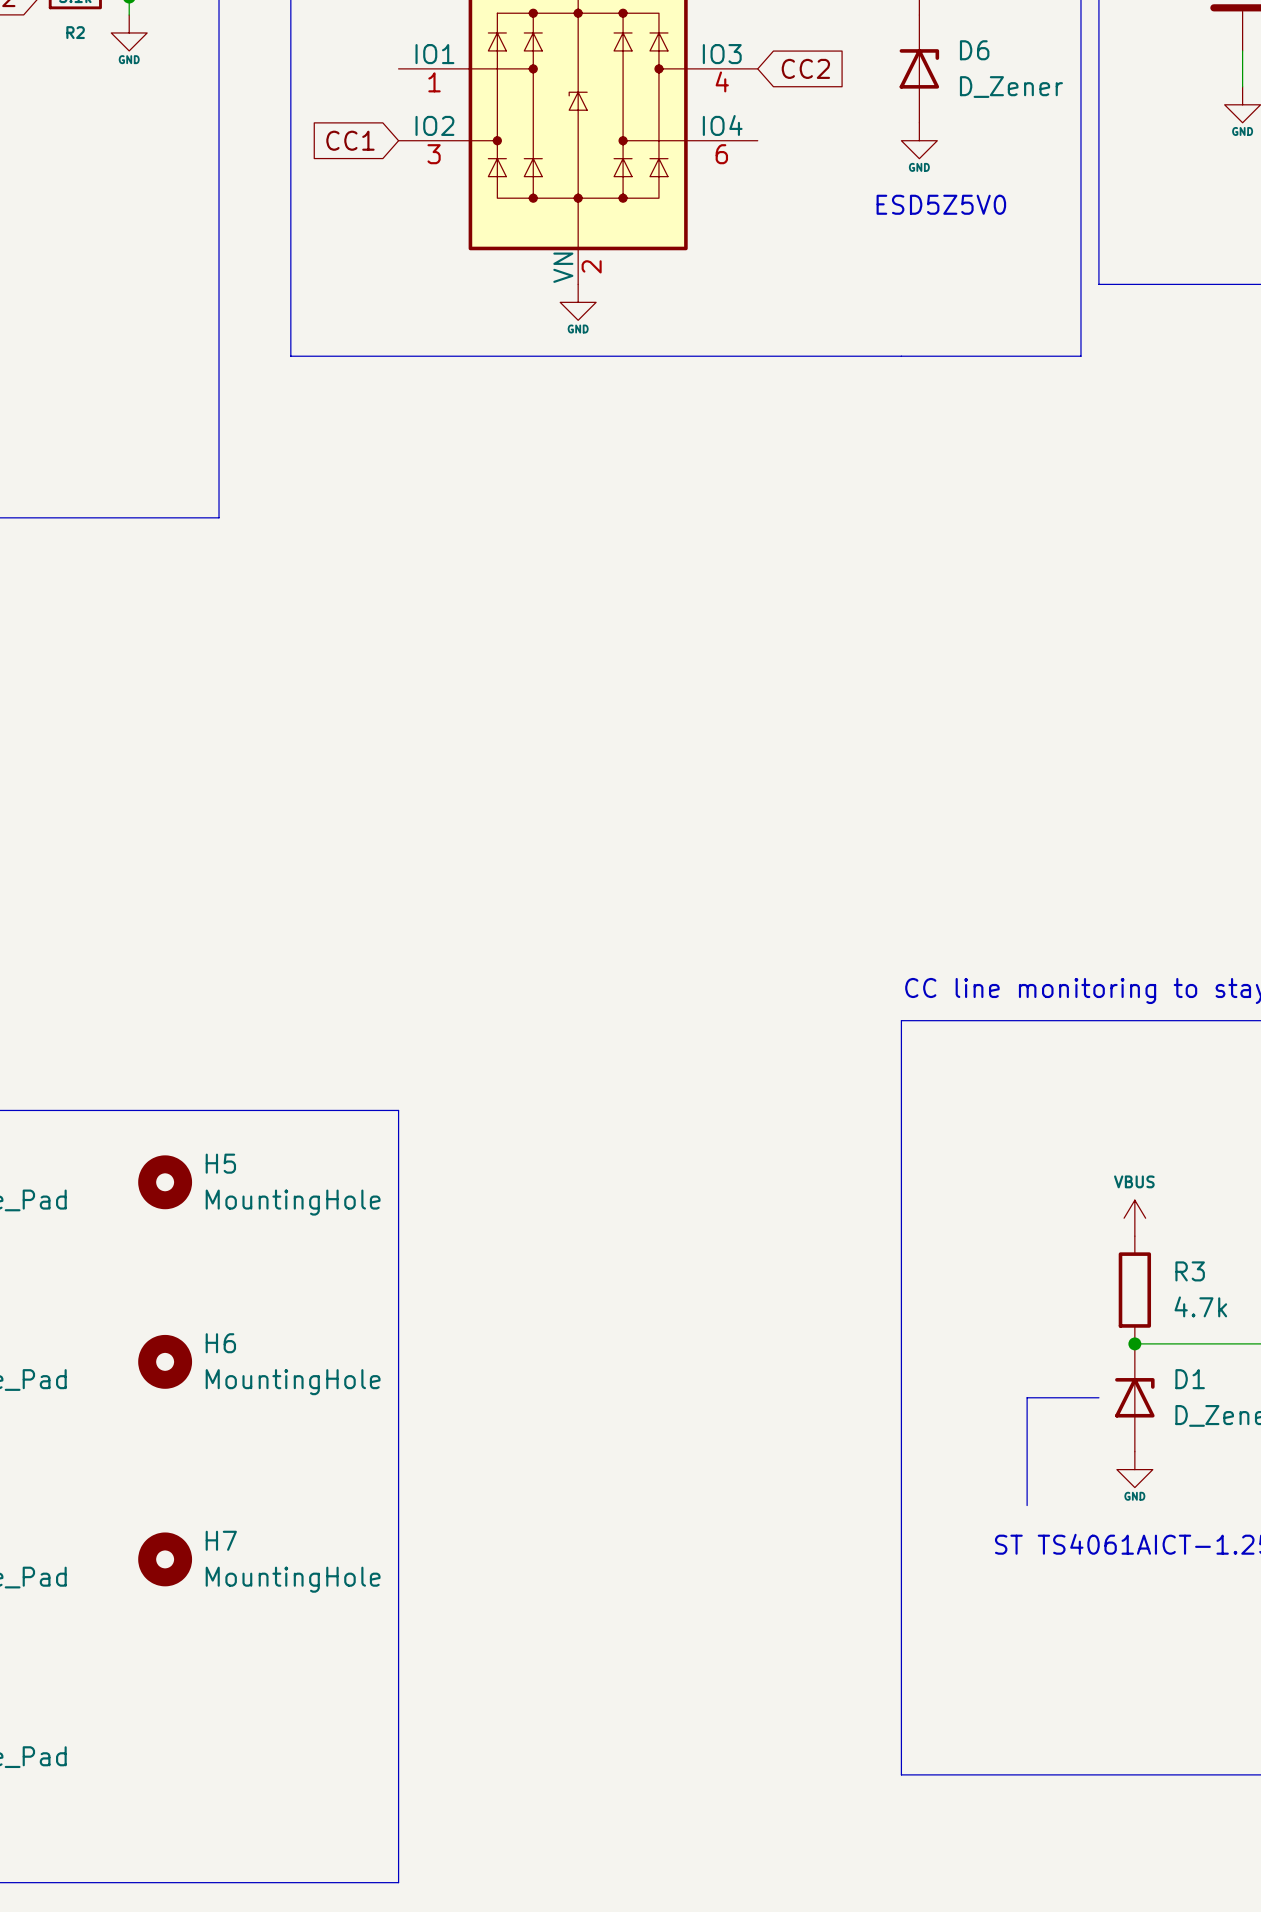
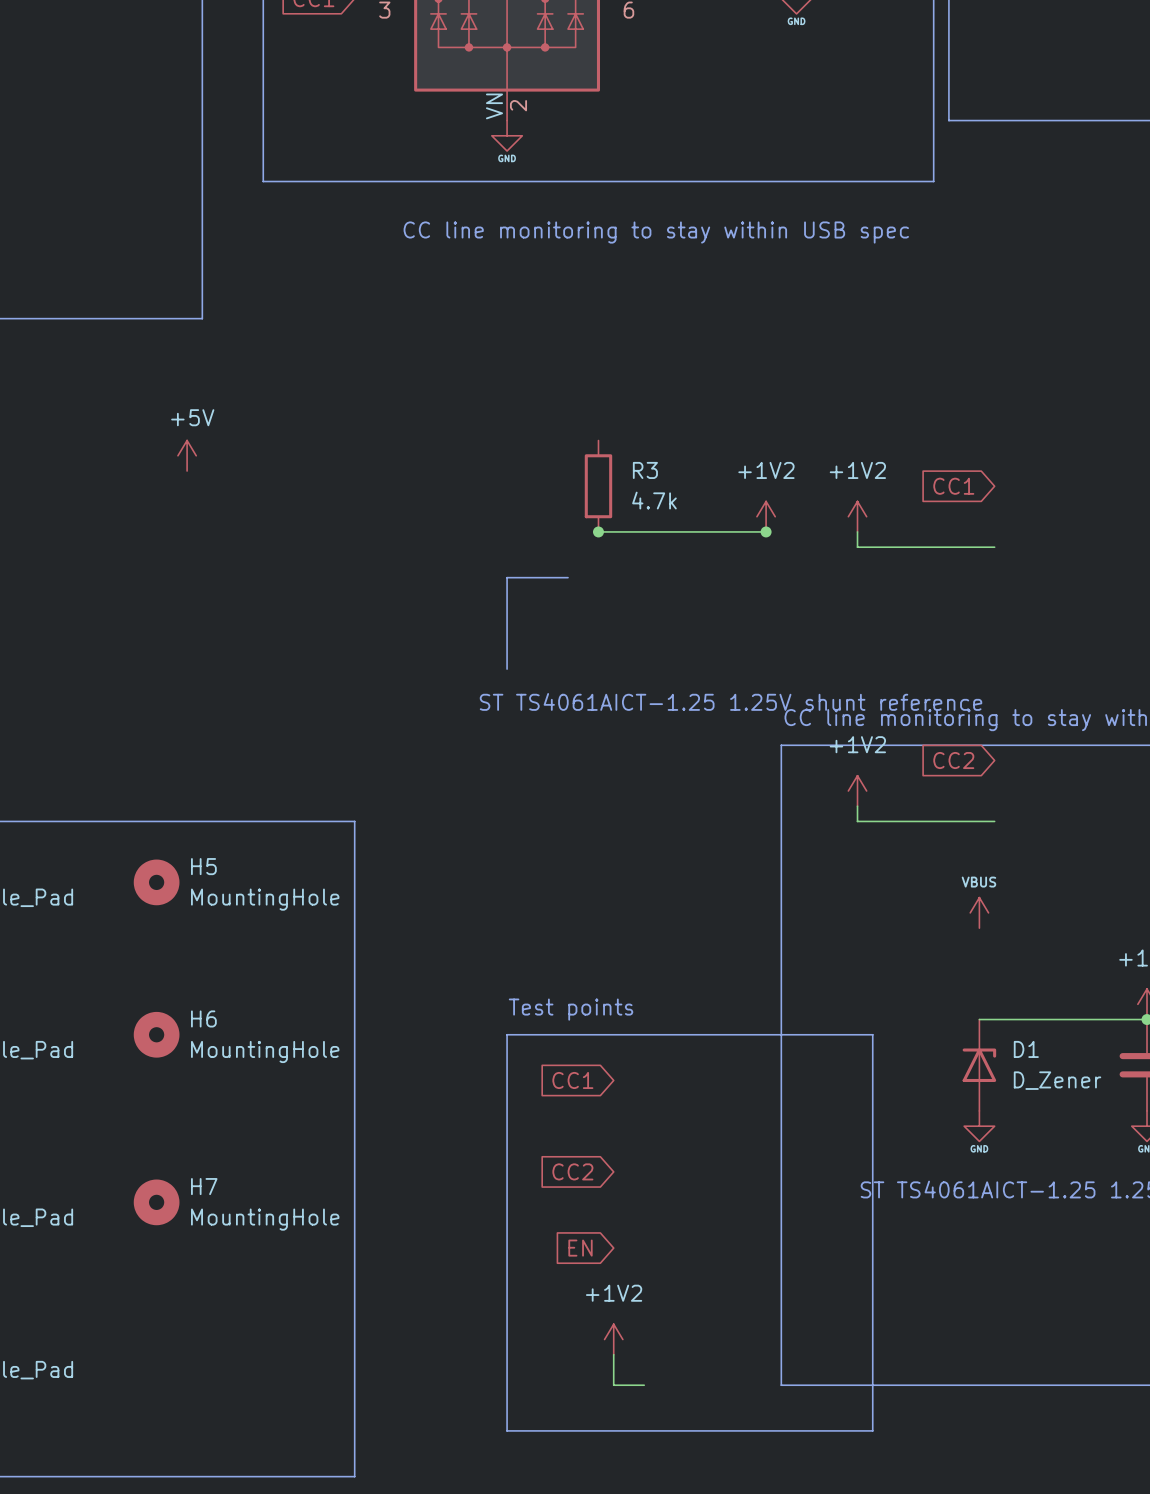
text: ESD5Z5V0 (941, 204) -> none
text: none -> CC line monitoring to stay within USB spec (656, 232)
power symbol: none -> +5V (187, 455)
global label: none -> CC1 (953, 486)
power symbol: none -> +1V2 (766, 516)
power symbol: none -> +1V2 (857, 516)
wire: none -> (598, 531) (766, 531)
junction: none -> (598, 531)
junction: none -> (766, 531)
wire: none -> (857, 531) (857, 547) (994, 547)
line: none -> (568, 577) (507, 577) (507, 669)
text: none -> ST TS4061AICT-1.25 1.25V shunt reference (731, 701)
global label: none -> CC2 (953, 760)
power symbol: none -> +1V2 (857, 790)
wire: none -> (857, 806) (857, 821) (994, 821)
R3 position: (1134, 1290) -> (598, 486)
text: none -> Test points (571, 1009)
junction: (1134, 1343) -> none
line: none -> (507, 1034) (507, 1430) (872, 1430) (872, 1034) (507, 1034)
line: (1098, 1397) (1027, 1397) (1027, 1505) -> none
global label: none -> CC1 (572, 1080)
global label: none -> CC2 (572, 1171)
global label: none -> EN (580, 1248)
power symbol: none -> +1V2 (613, 1339)
wire: none -> (613, 1354) (613, 1385) (644, 1385)

